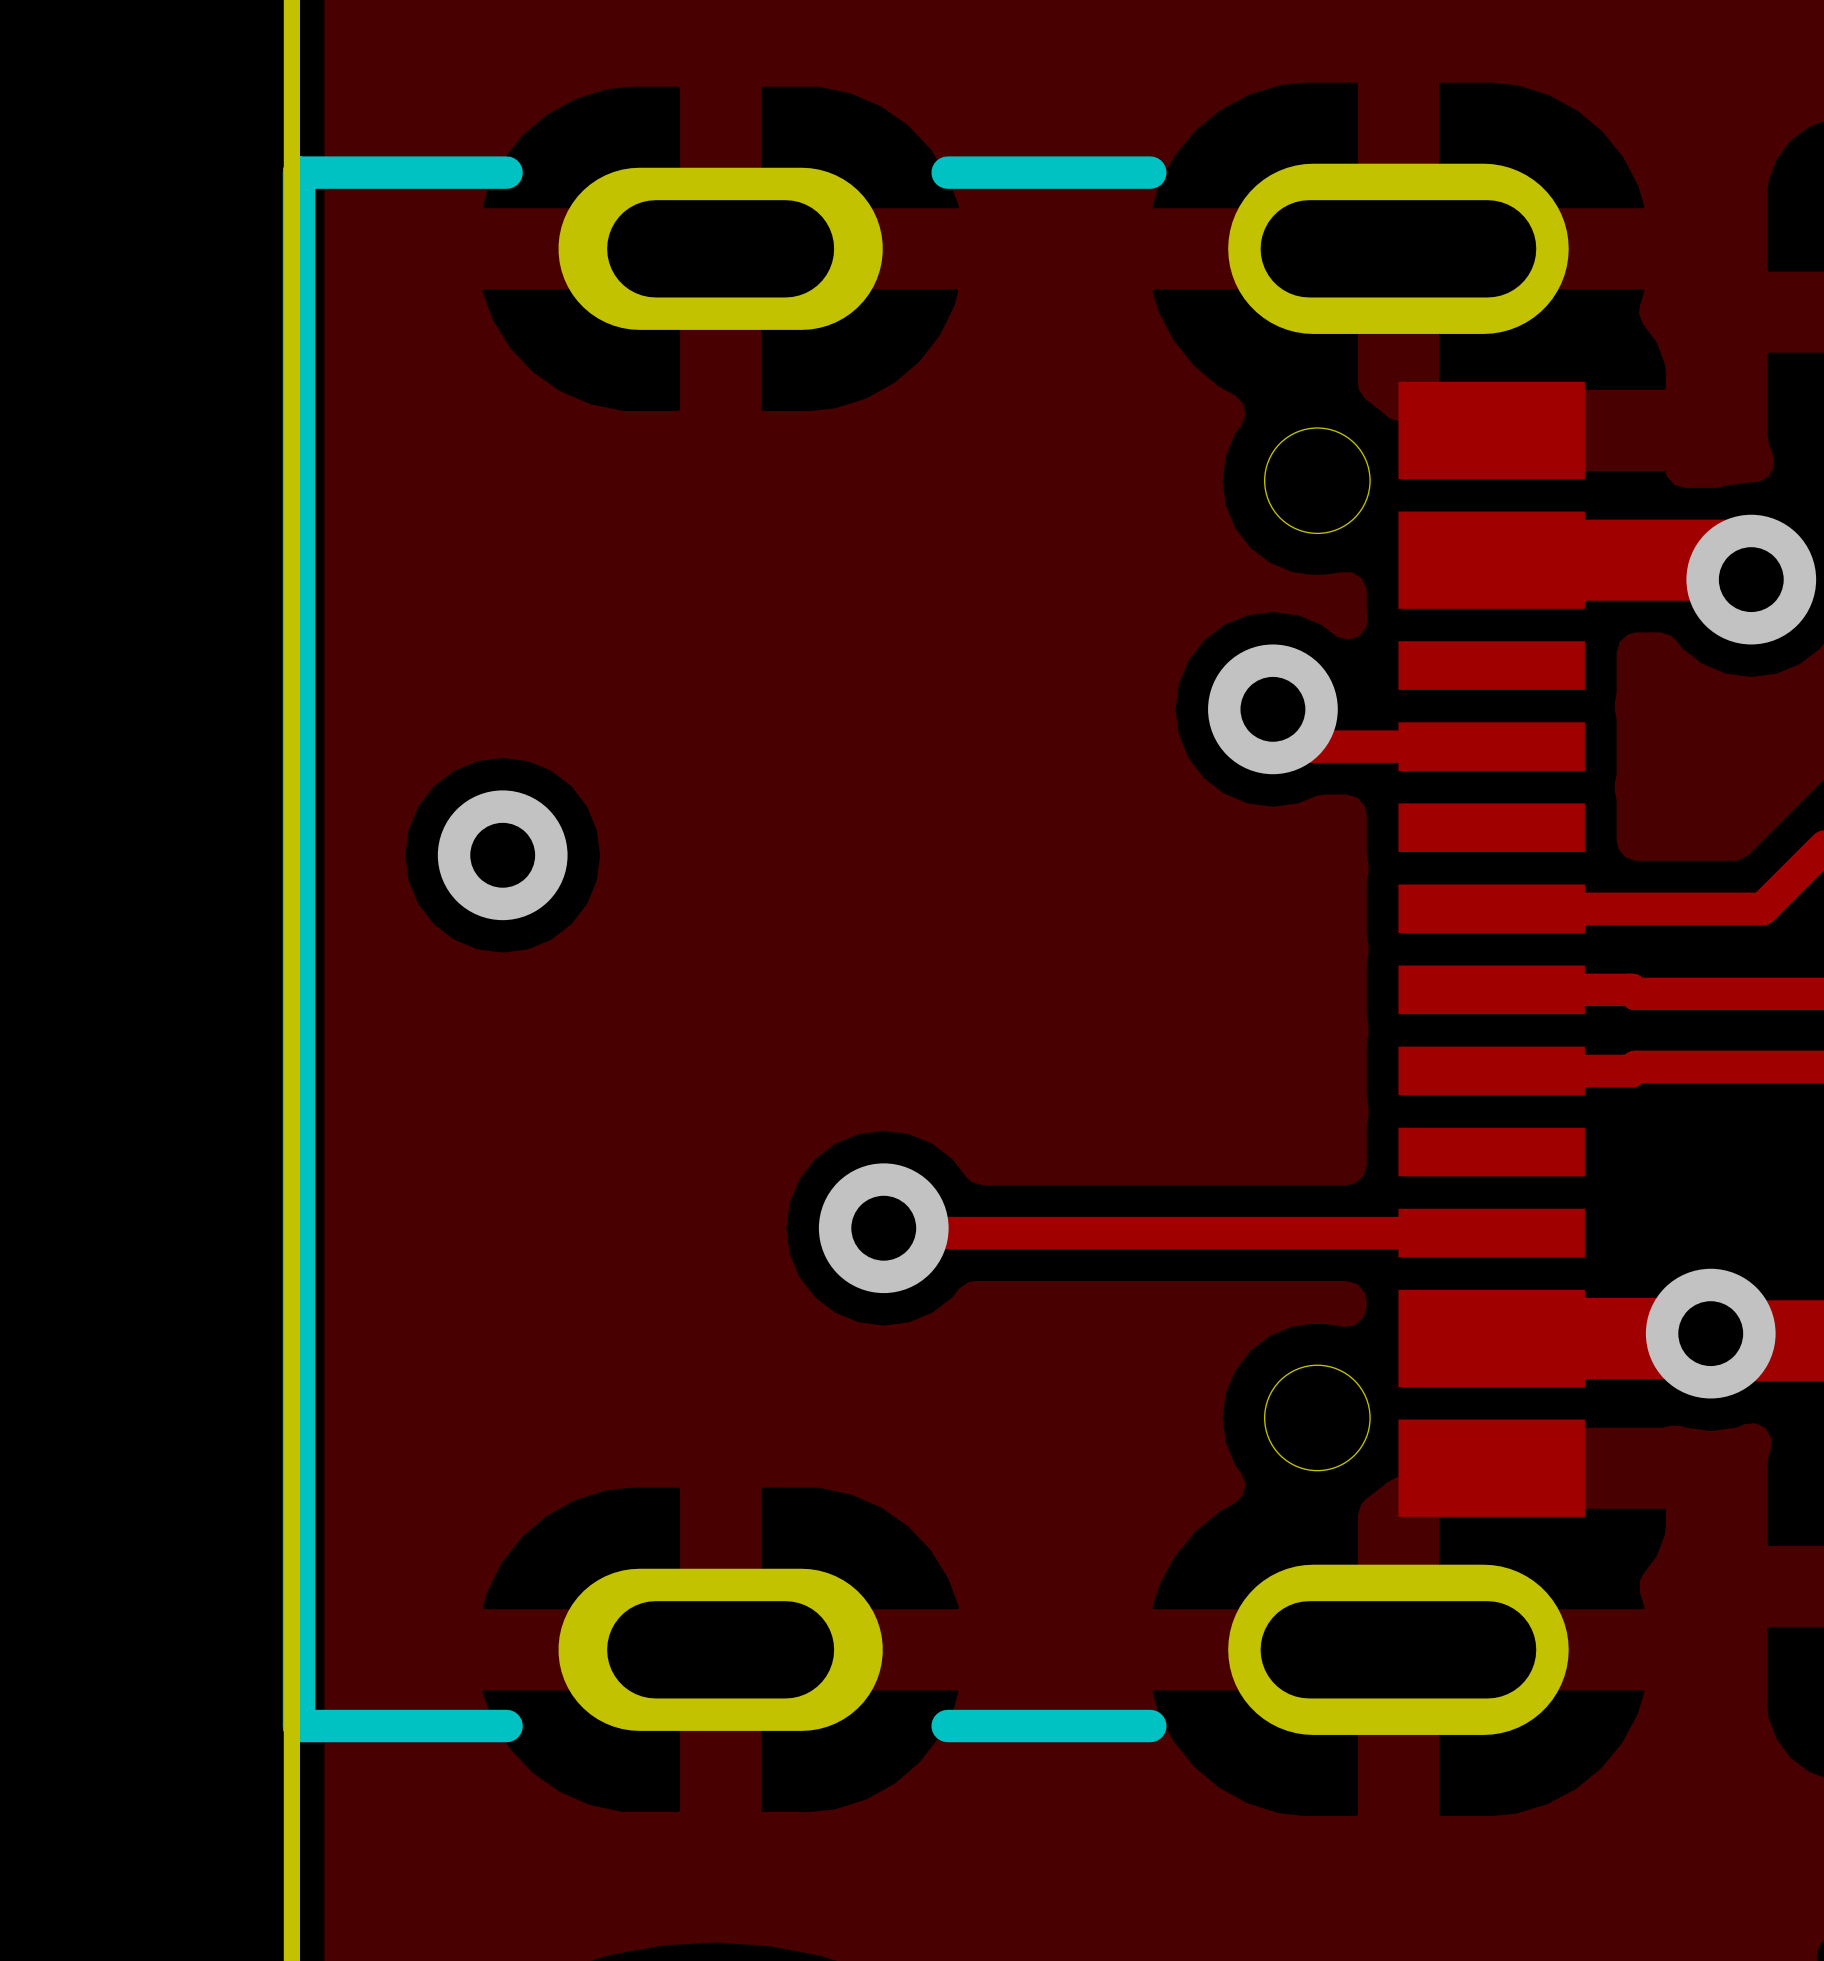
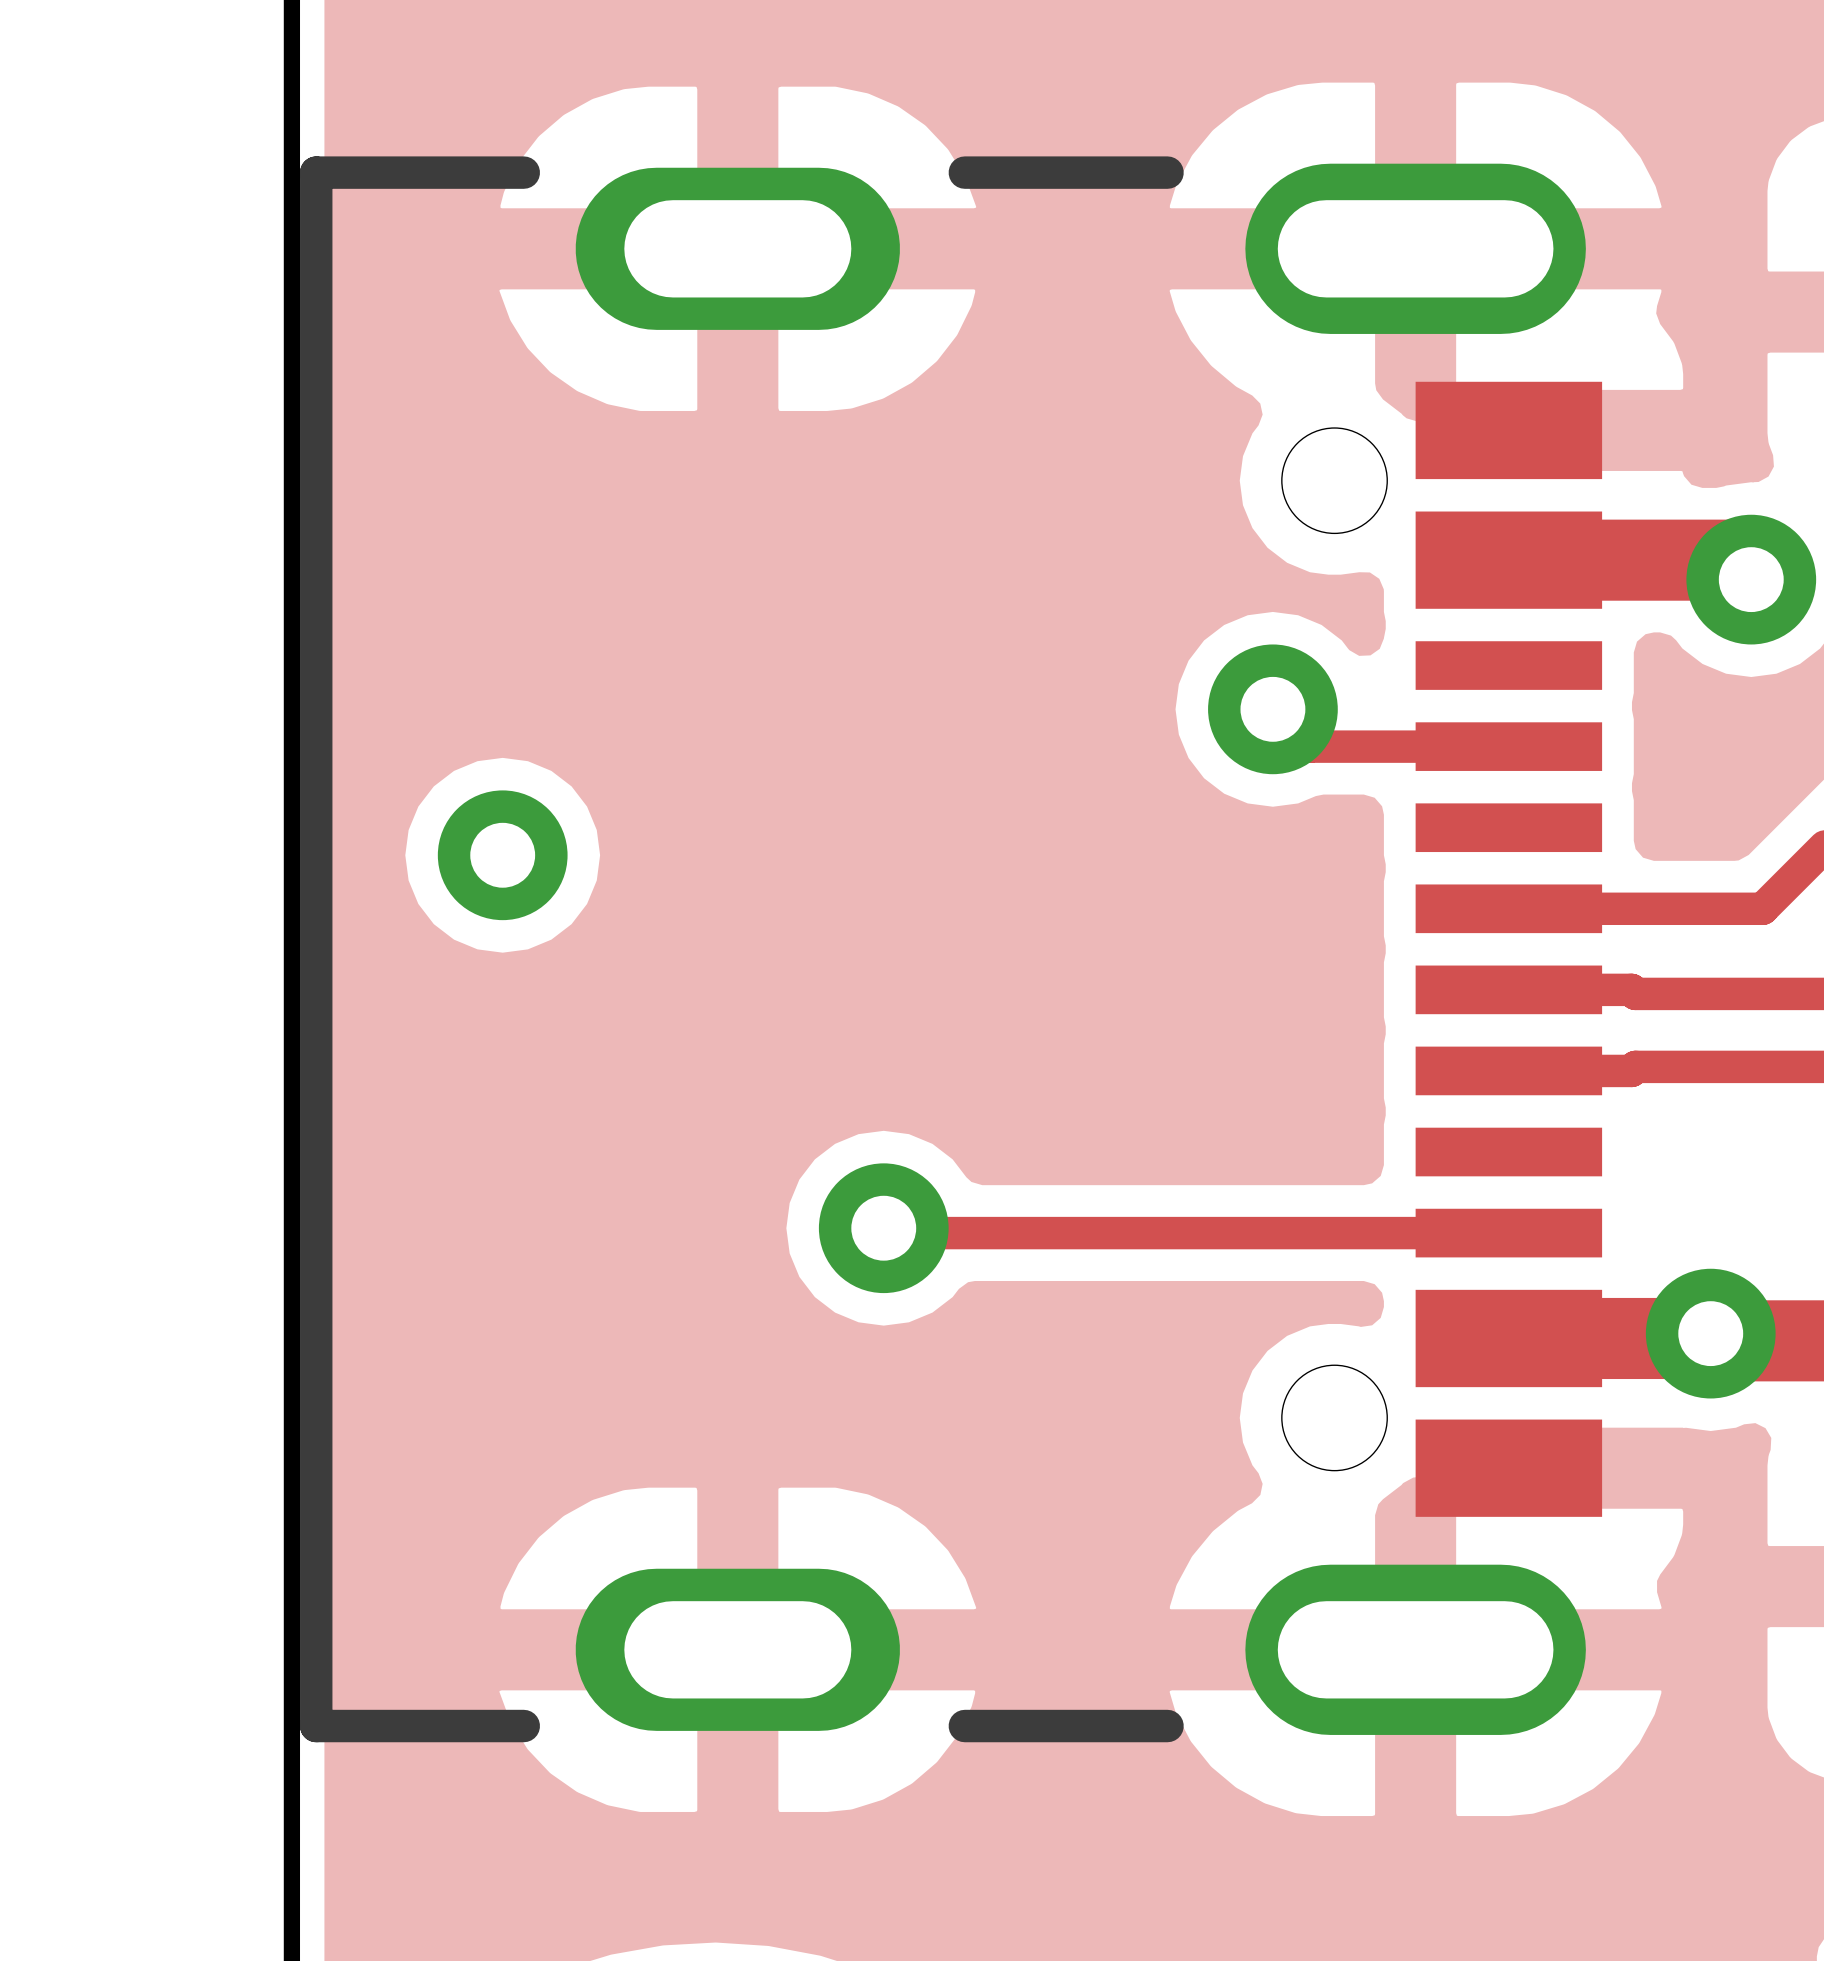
part position: (933, 949) -> (951, 949)

